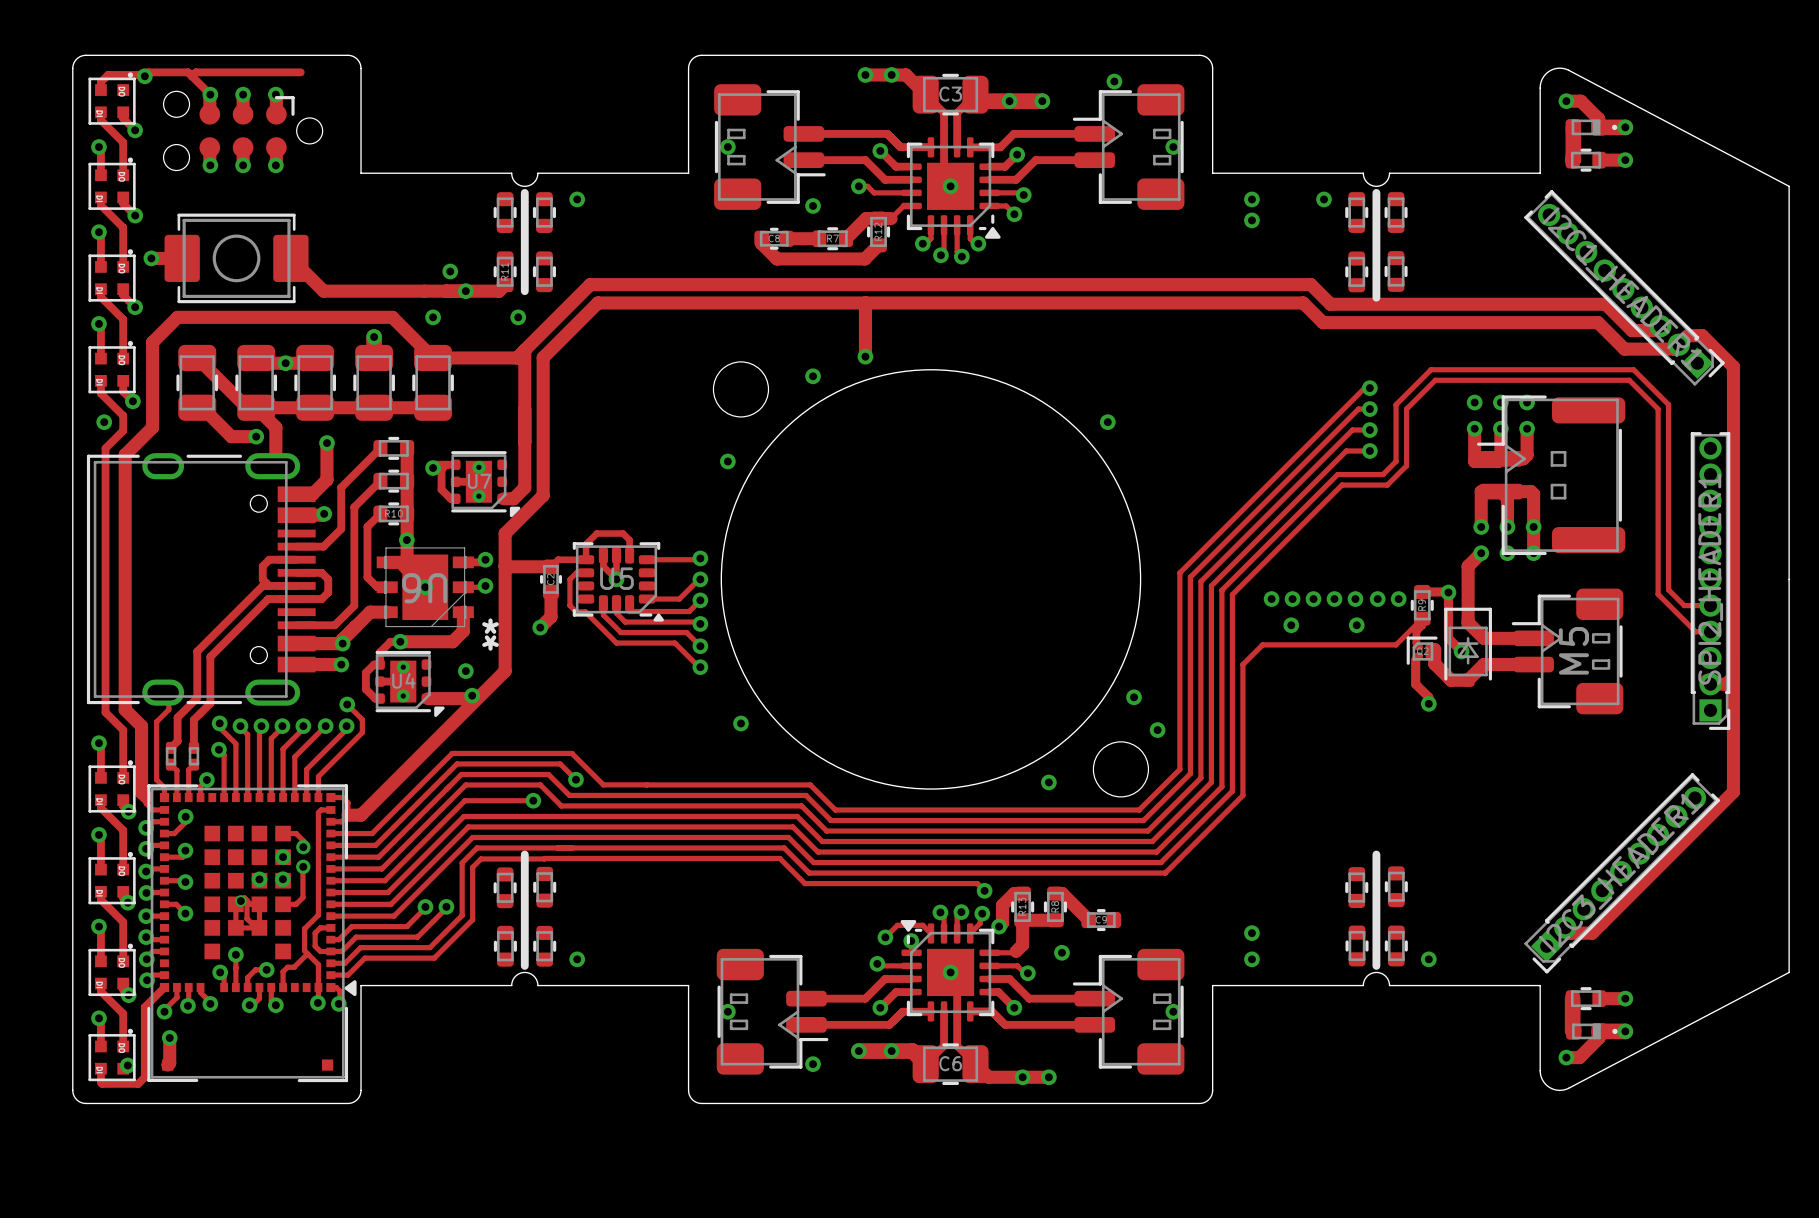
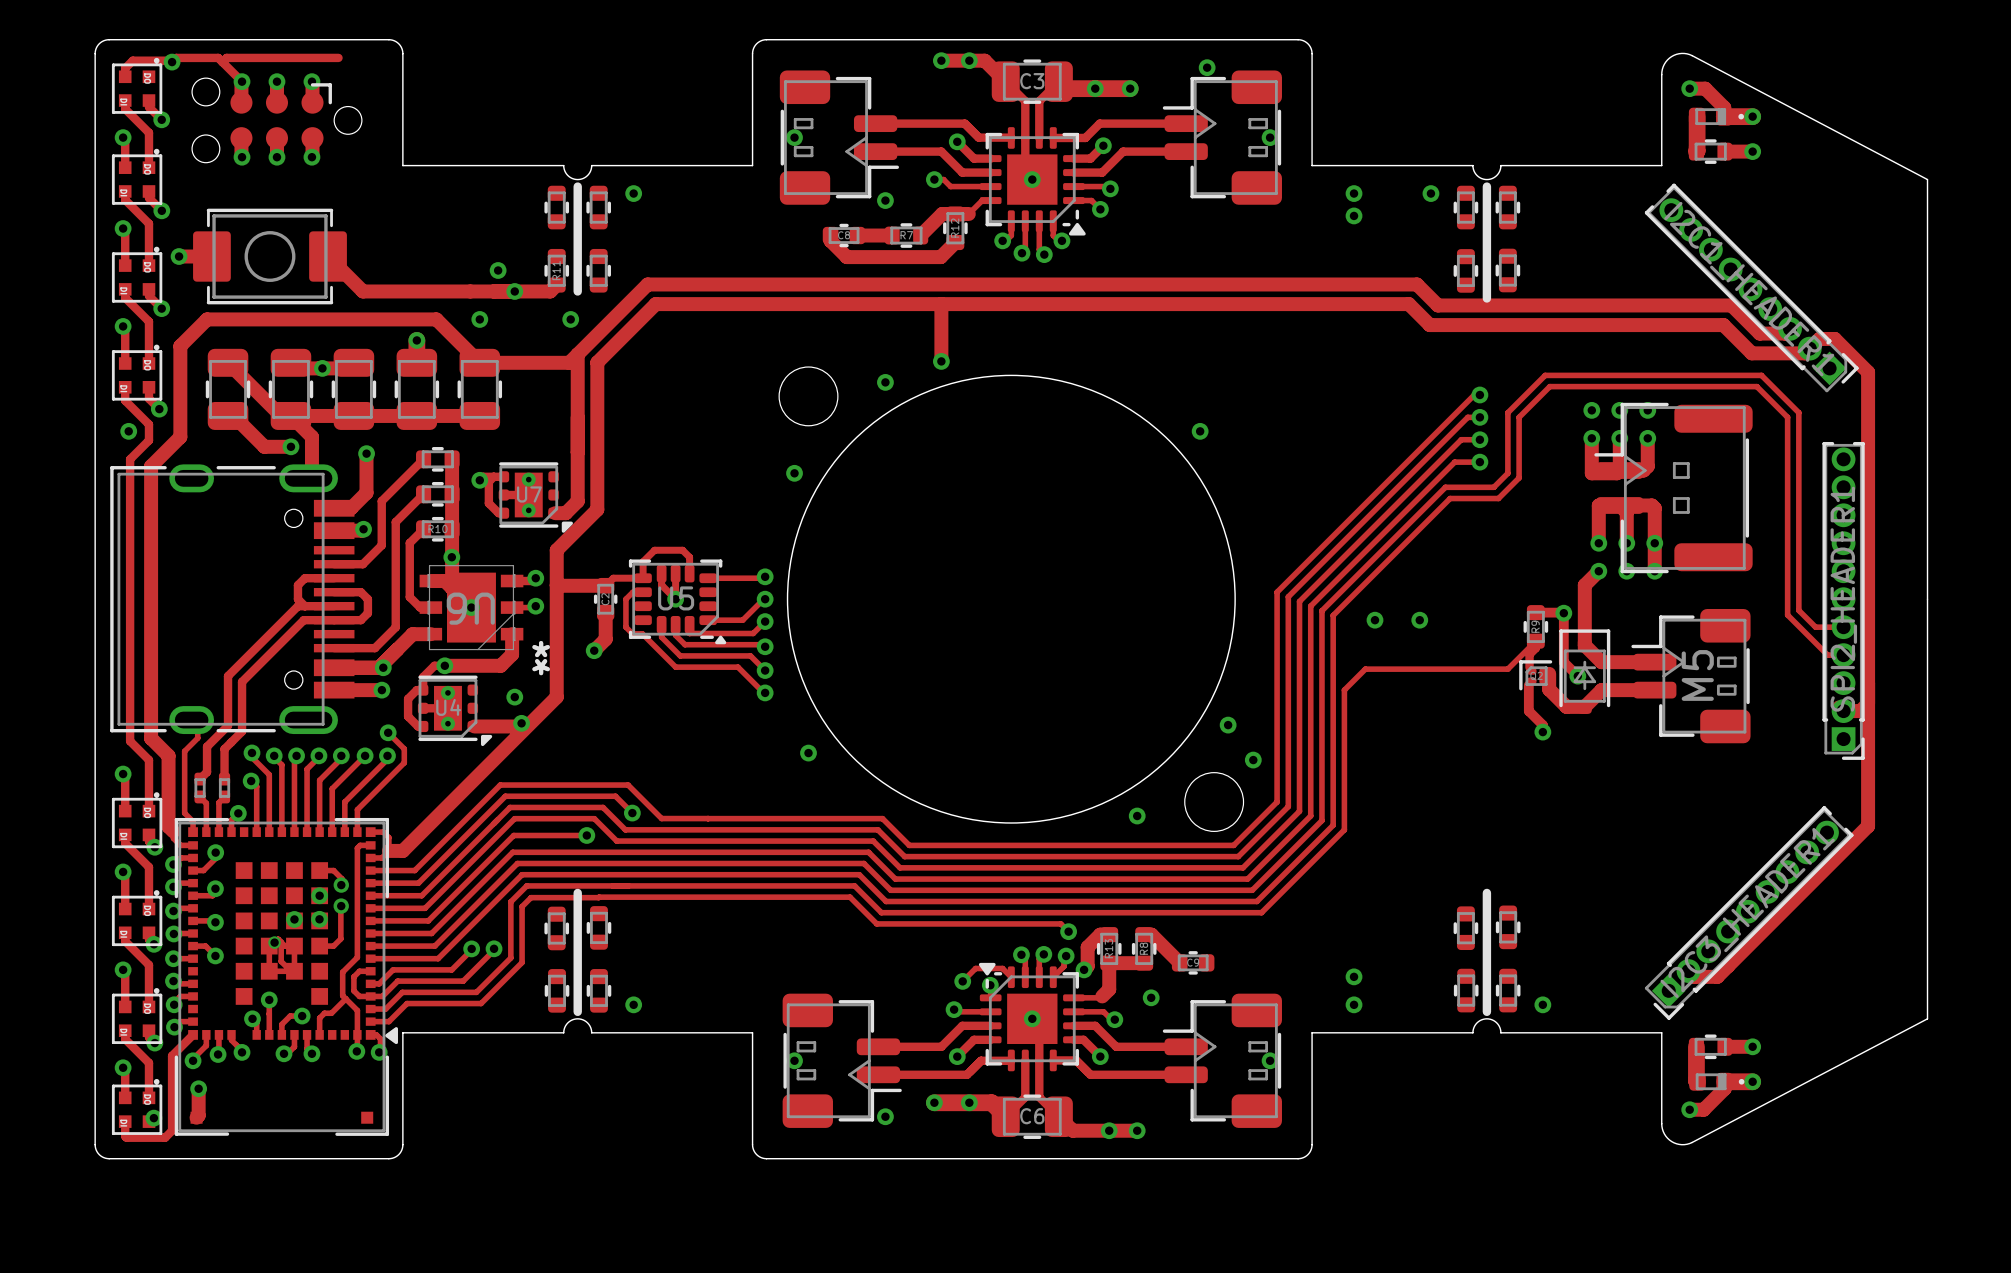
via: (1292, 599) -> none
via: (1334, 599) -> none
via: (1355, 599) -> none
via: (1377, 599) -> none
via: (1398, 599) -> none
via: (1291, 625) -> none
via: (1356, 625) -> none

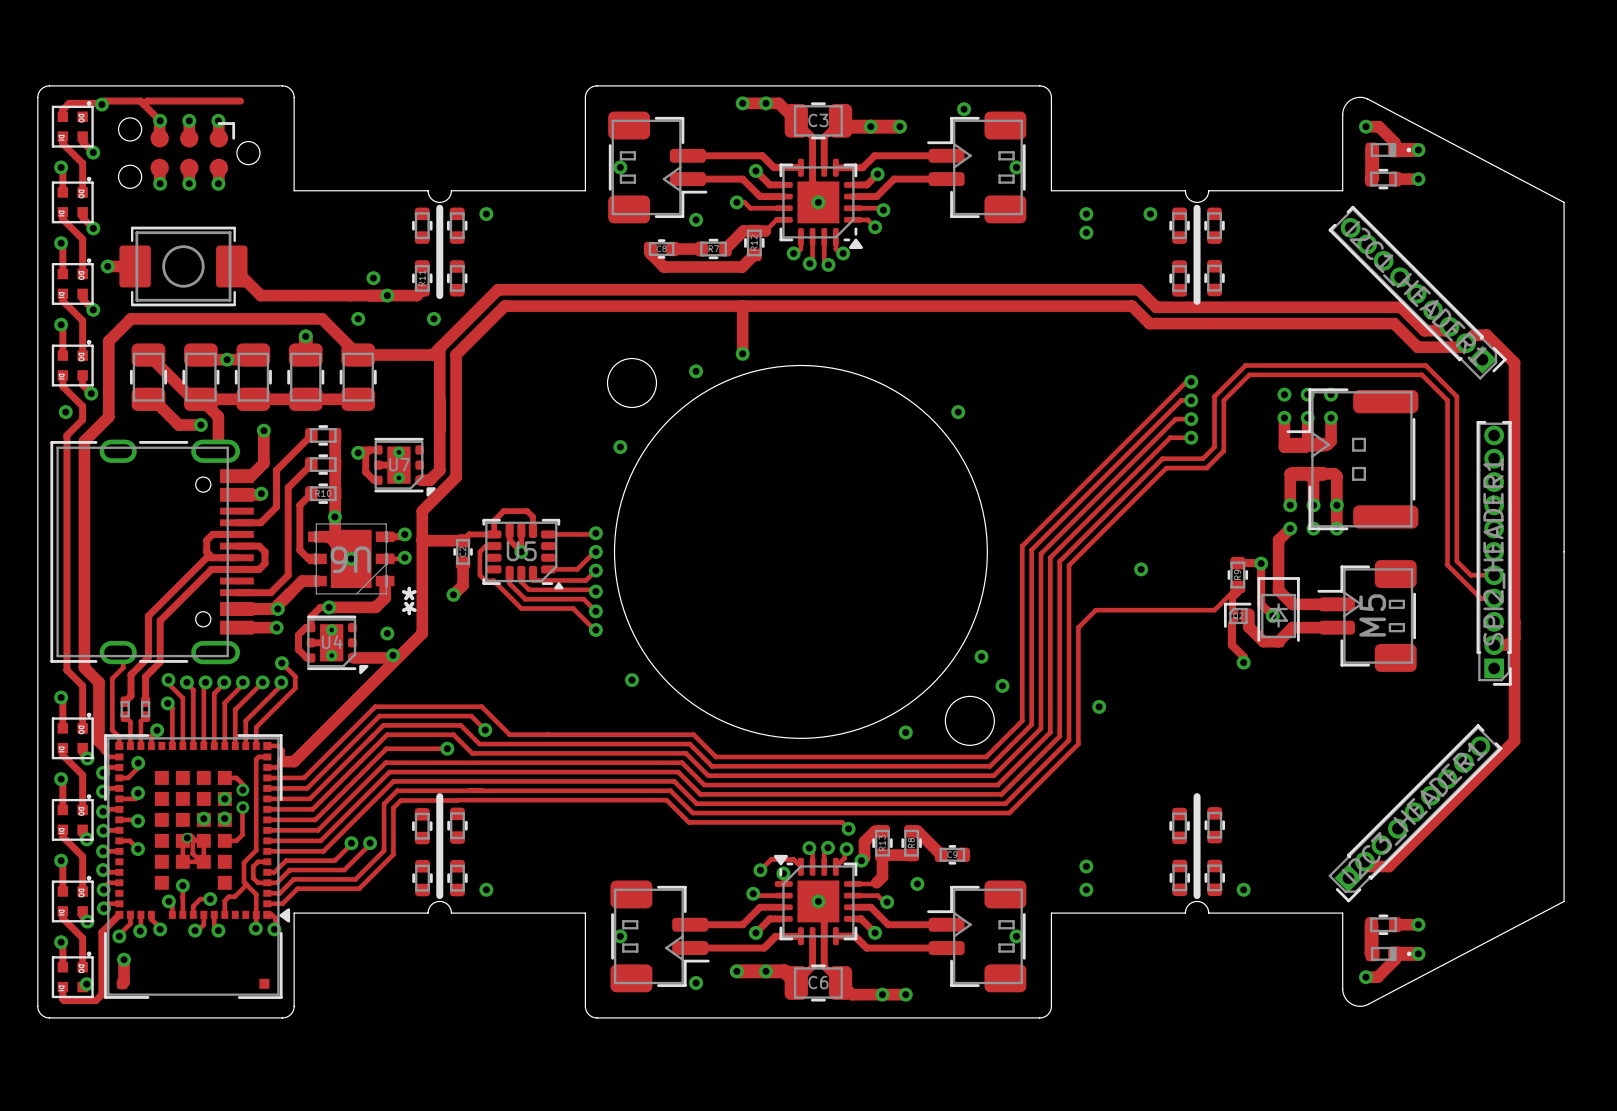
via position: (1375, 620) -> (1099, 706)

